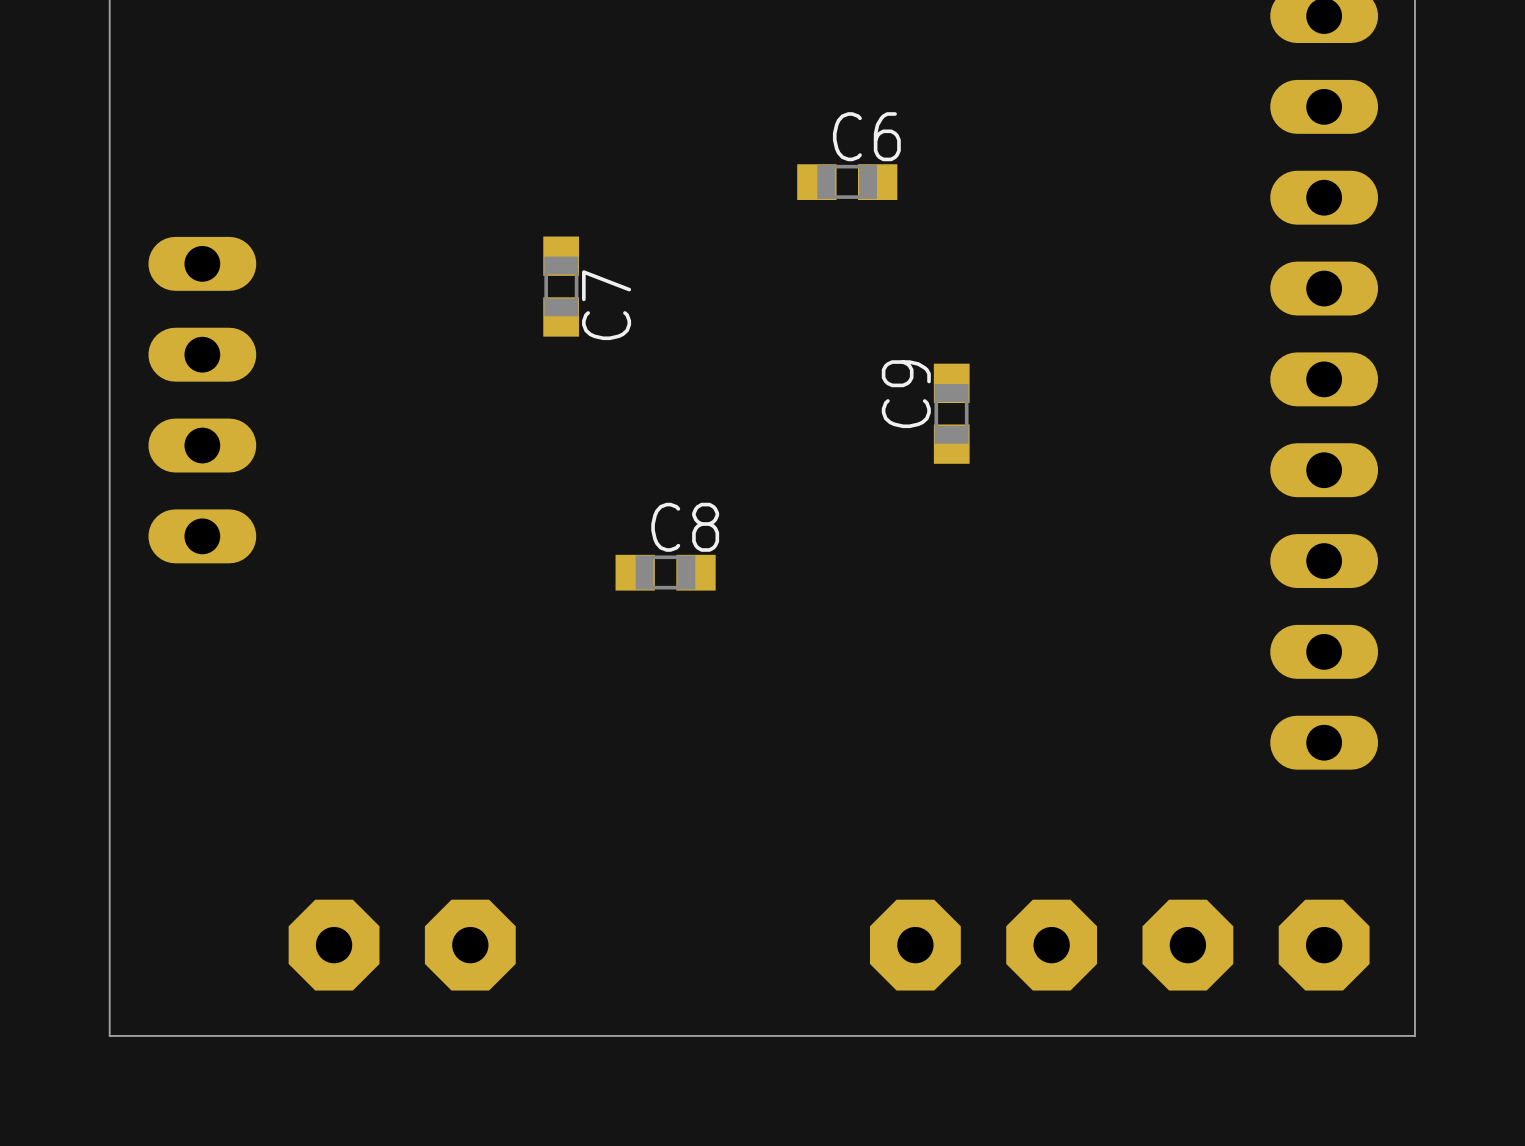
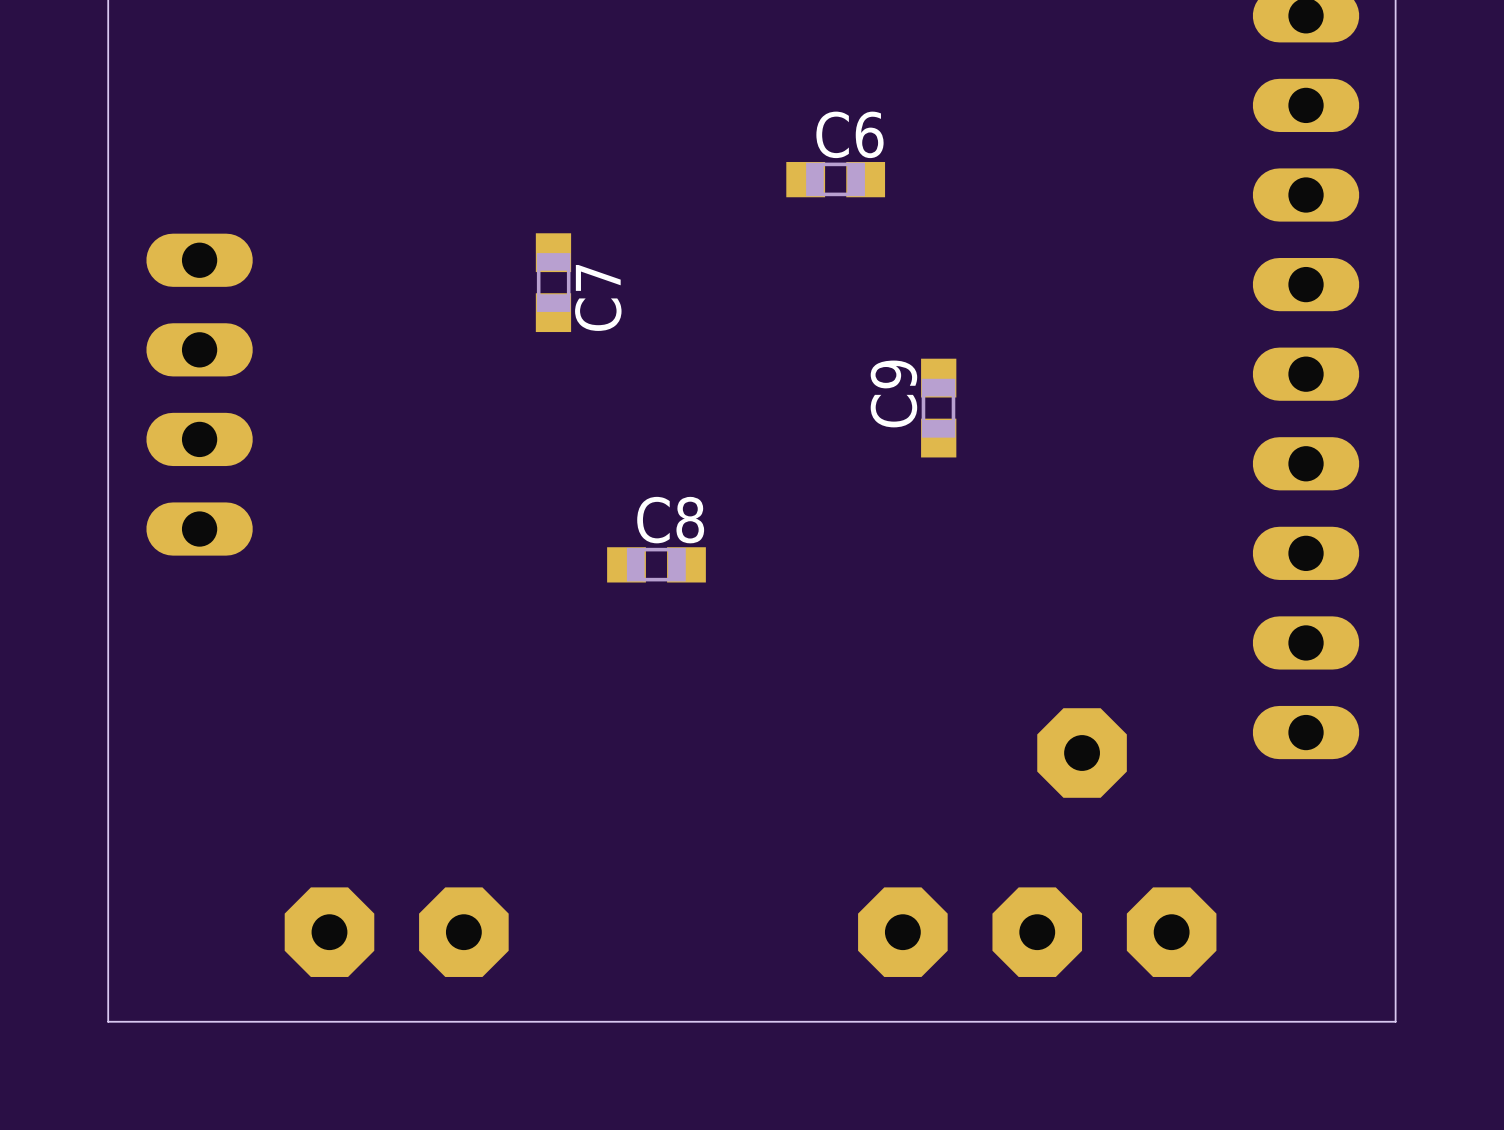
part position: (1324, 945) -> (1082, 753)

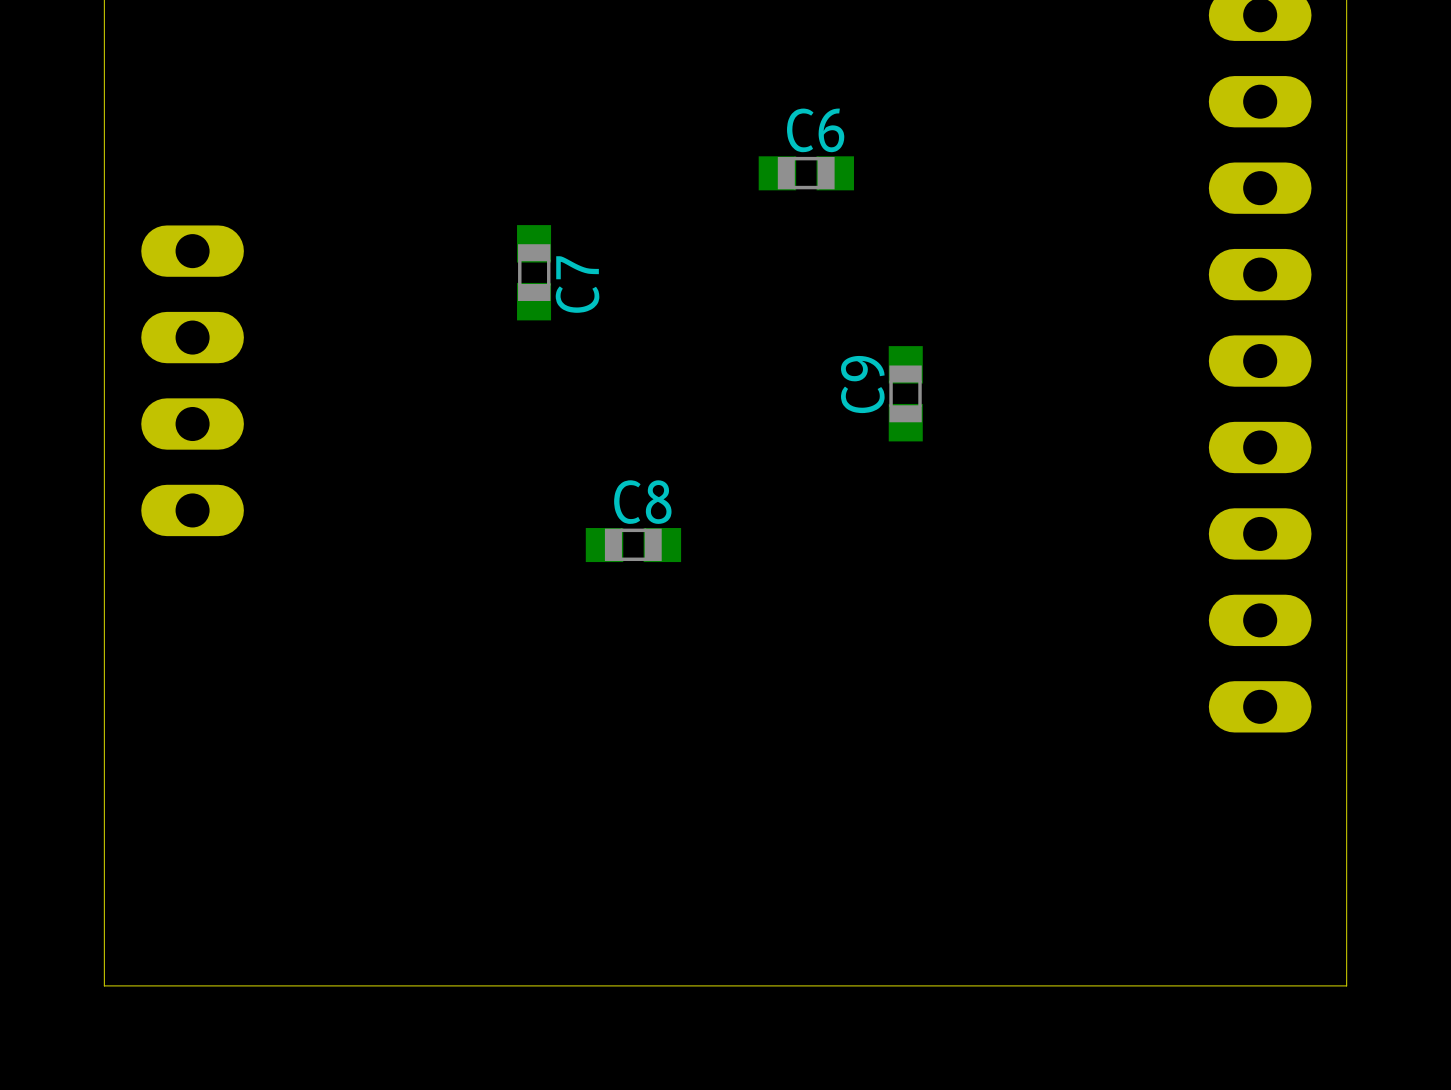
part: (1082, 753) -> none
part: (329, 932) -> none
part: (463, 932) -> none
part: (902, 932) -> none
part: (1037, 932) -> none
part: (1171, 932) -> none

